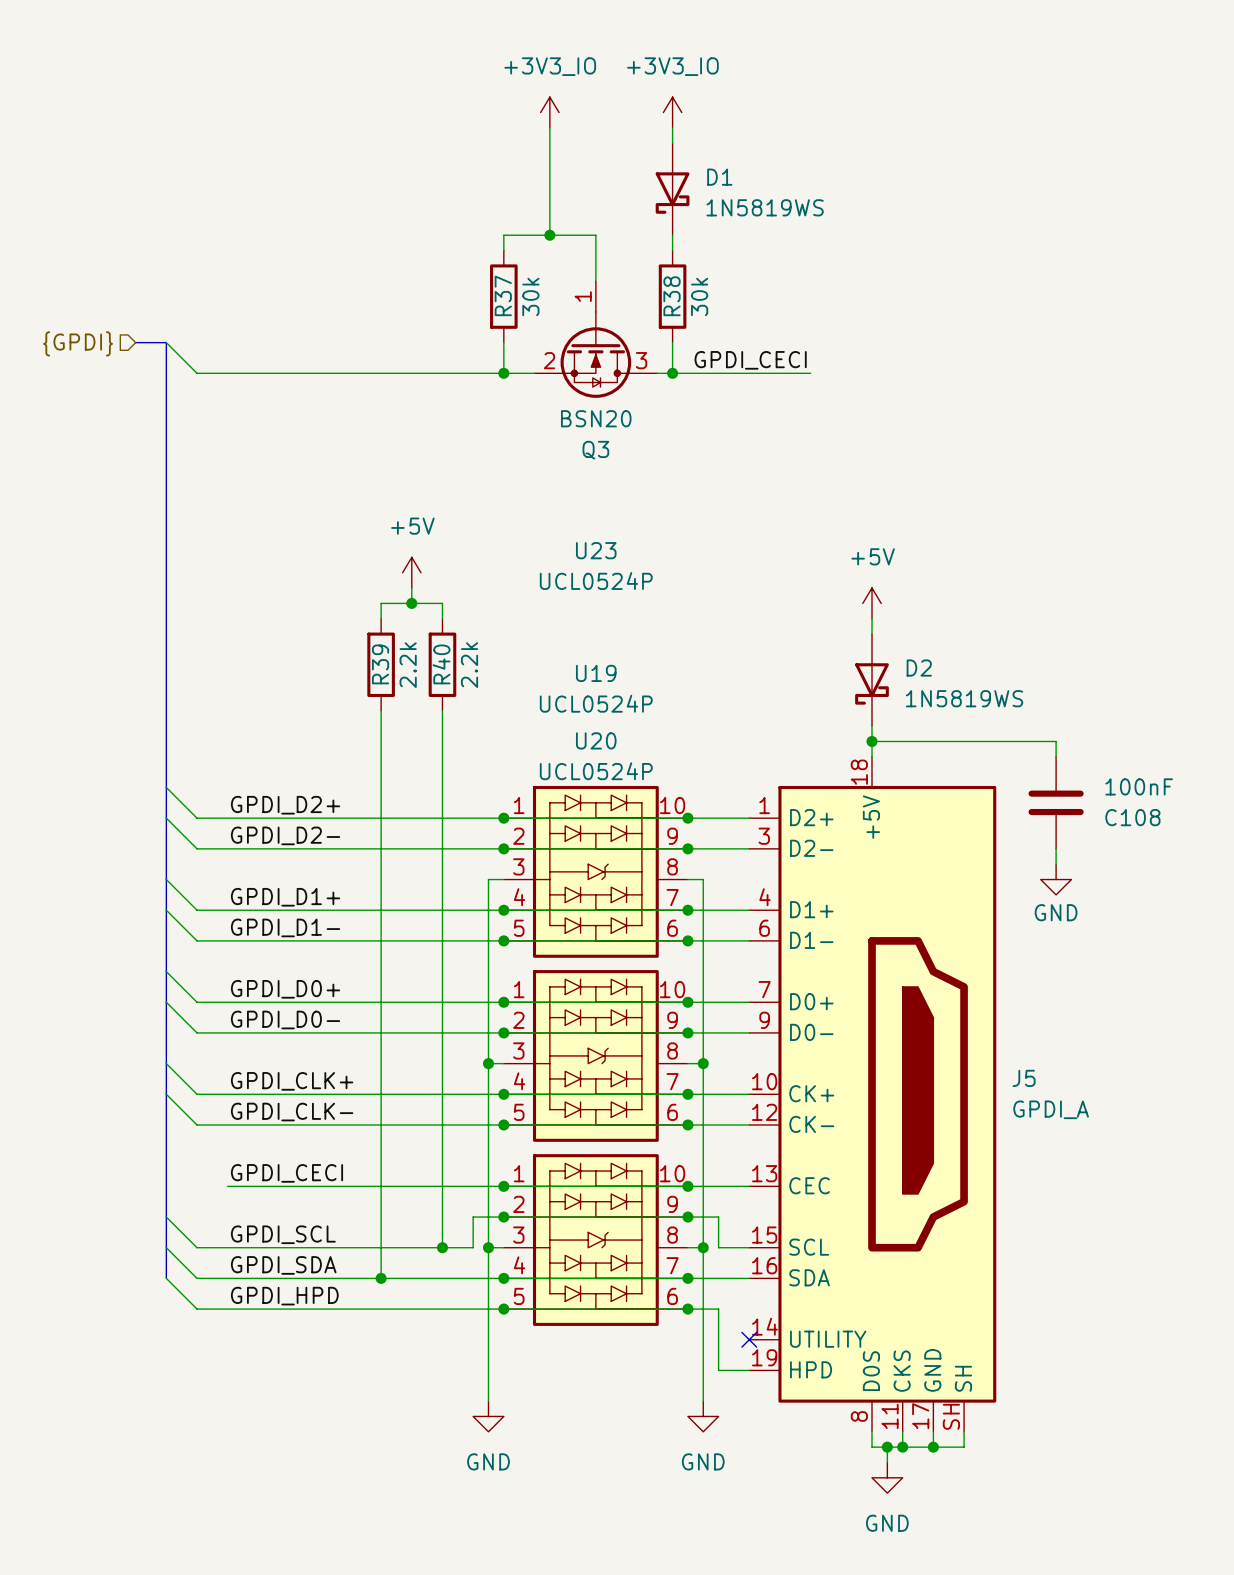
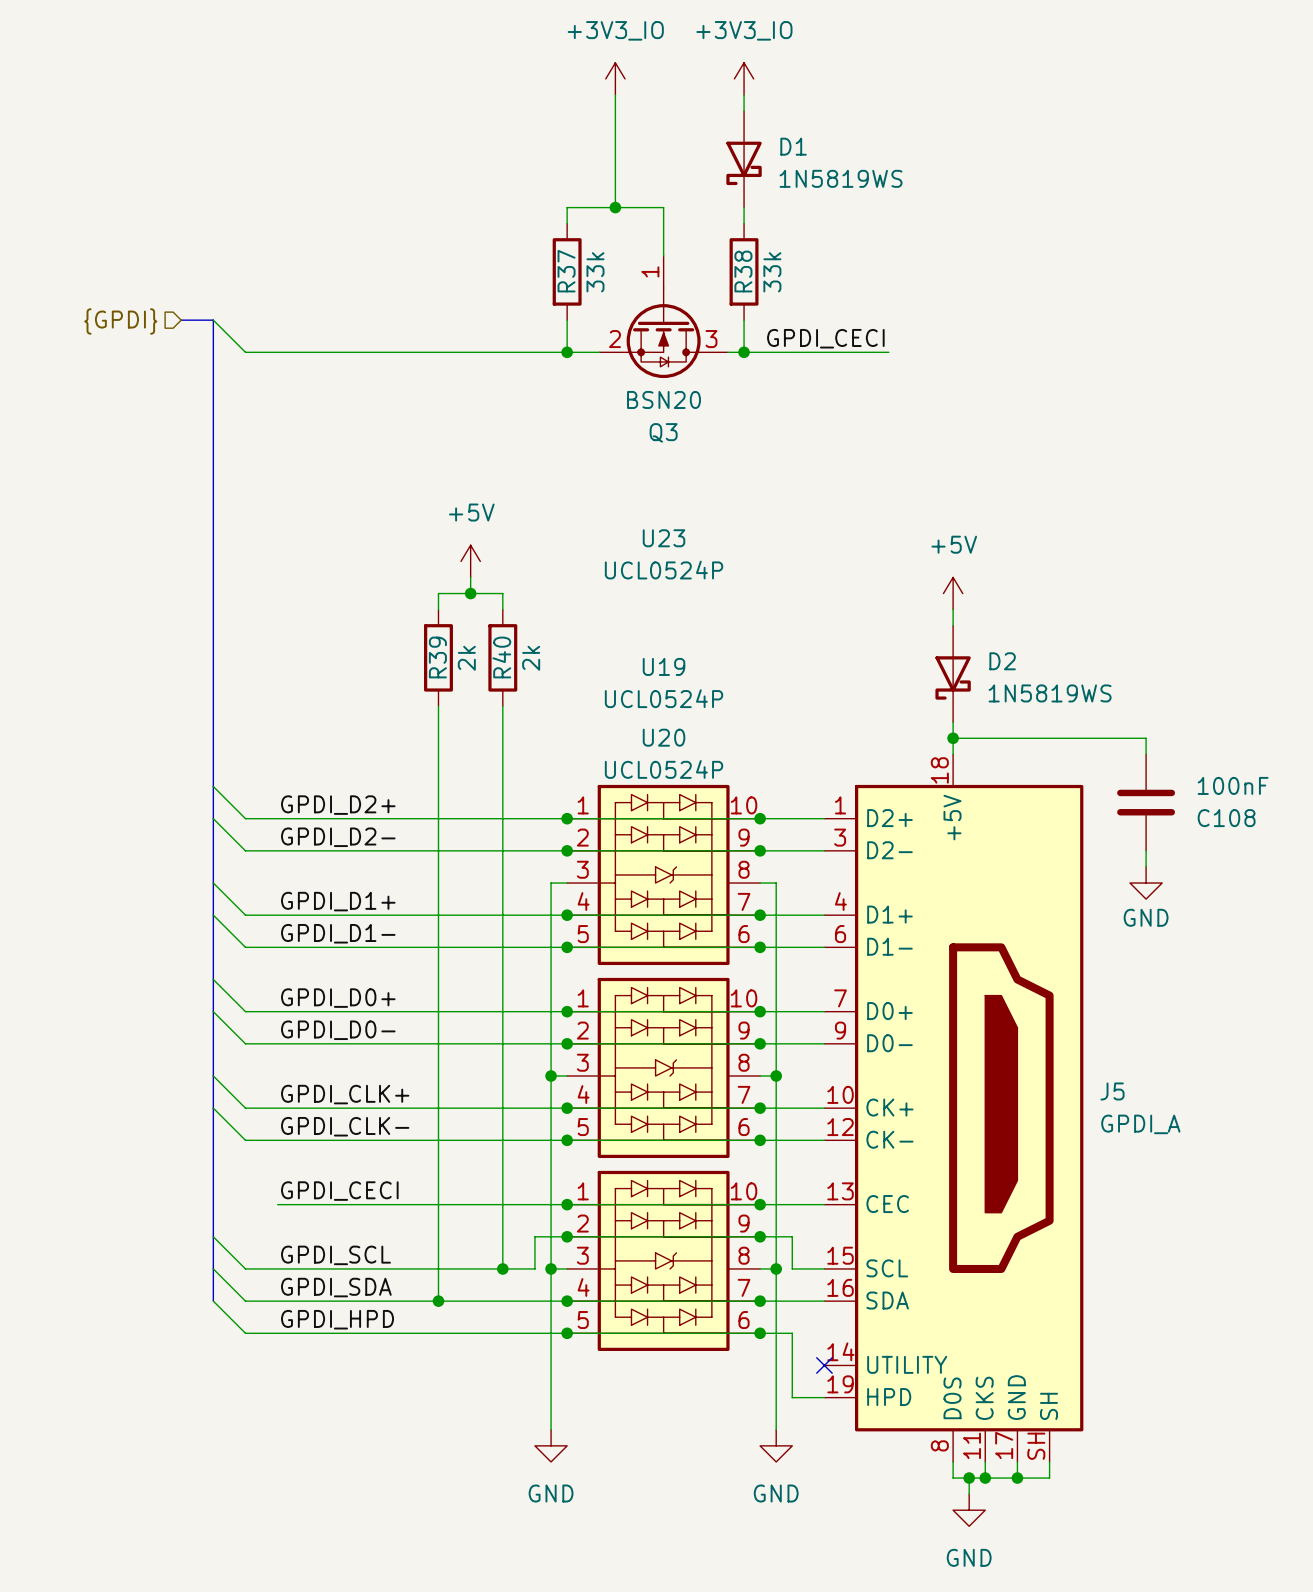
R37 value: 30k (530, 296) -> 33k (595, 272)
R38 value: 30k (699, 296) -> 33k (772, 272)
R39 value: 2.2k (408, 665) -> 2k (466, 658)
R40 value: 2.2k (469, 665) -> 2k (531, 658)

